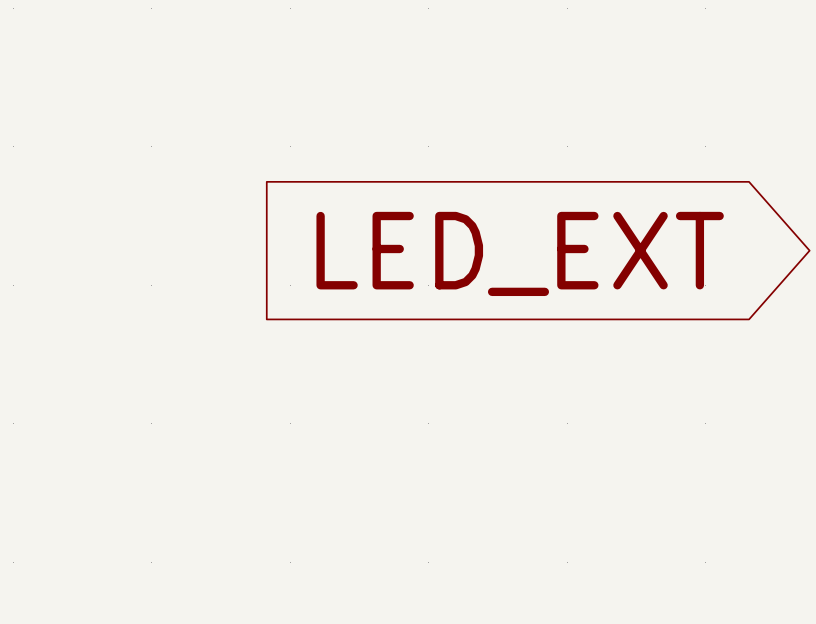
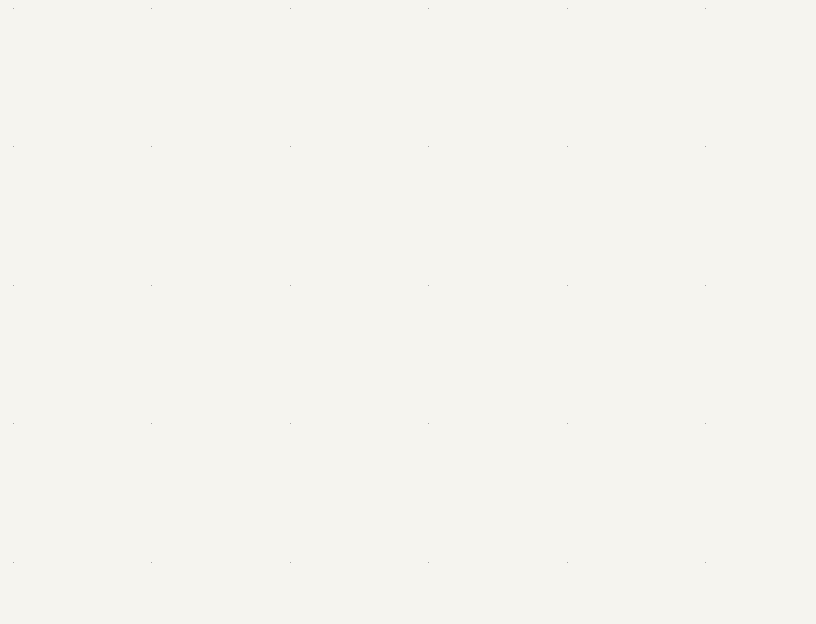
global label: LED_EXT (520, 253) -> none

